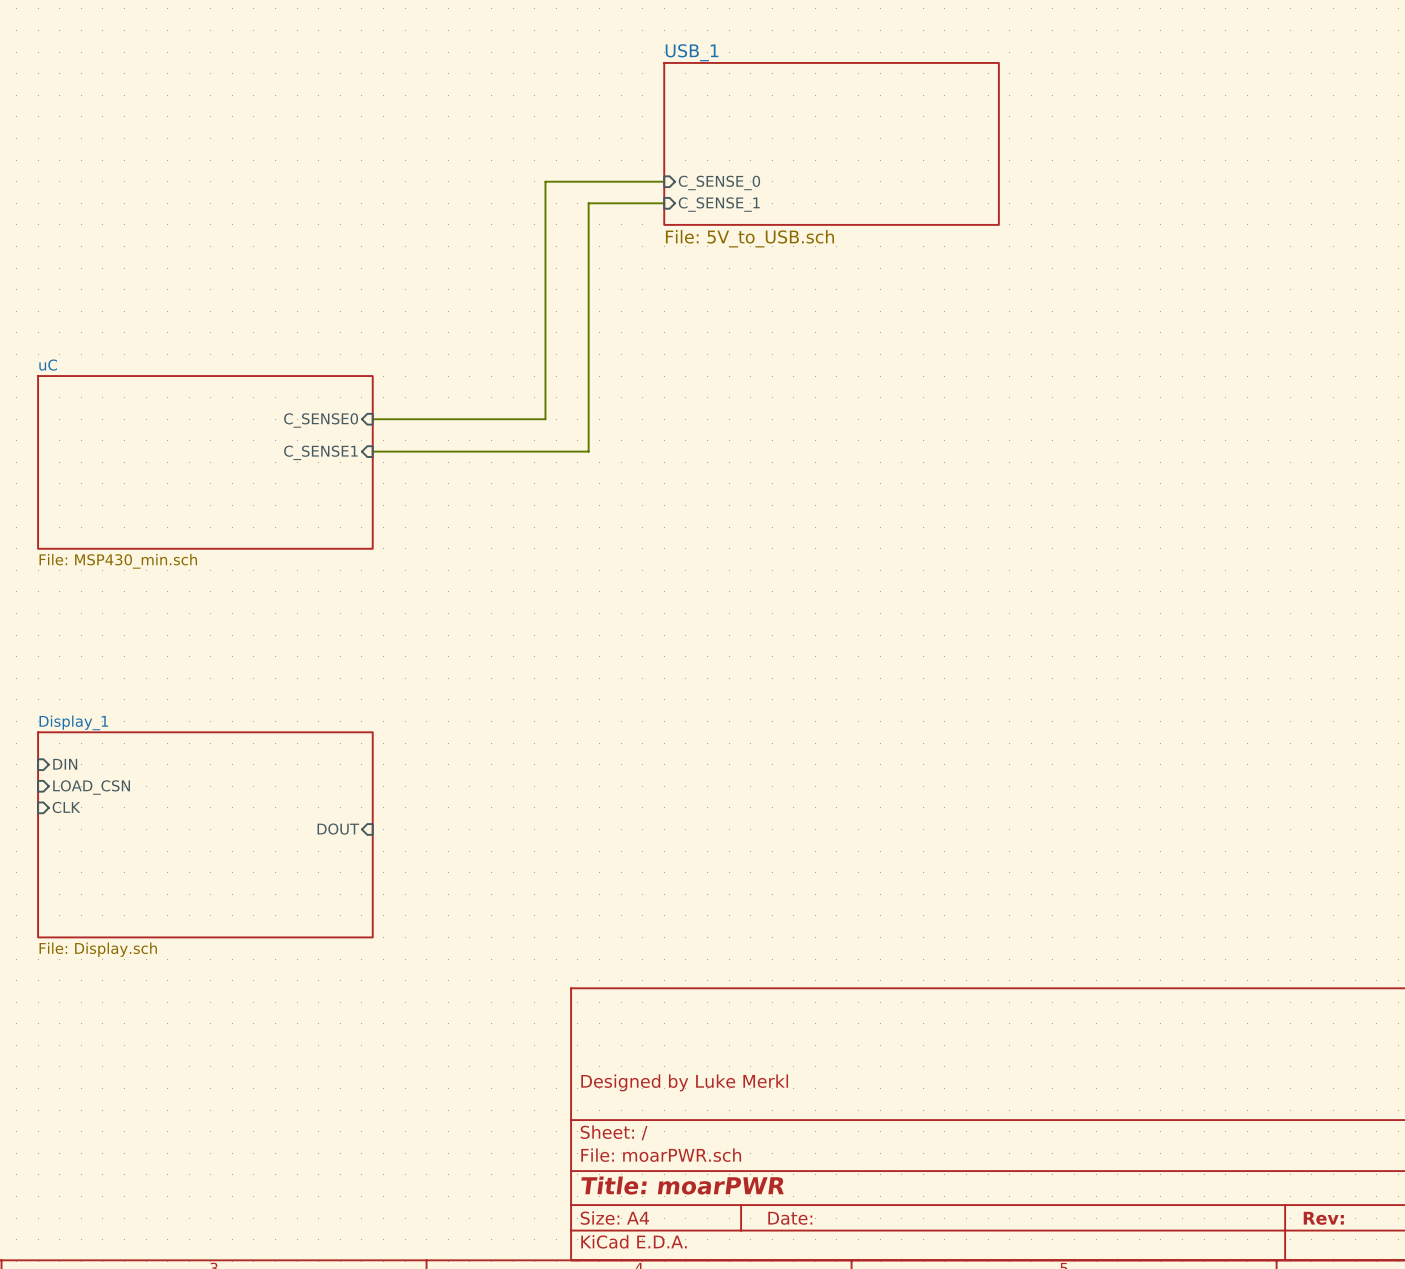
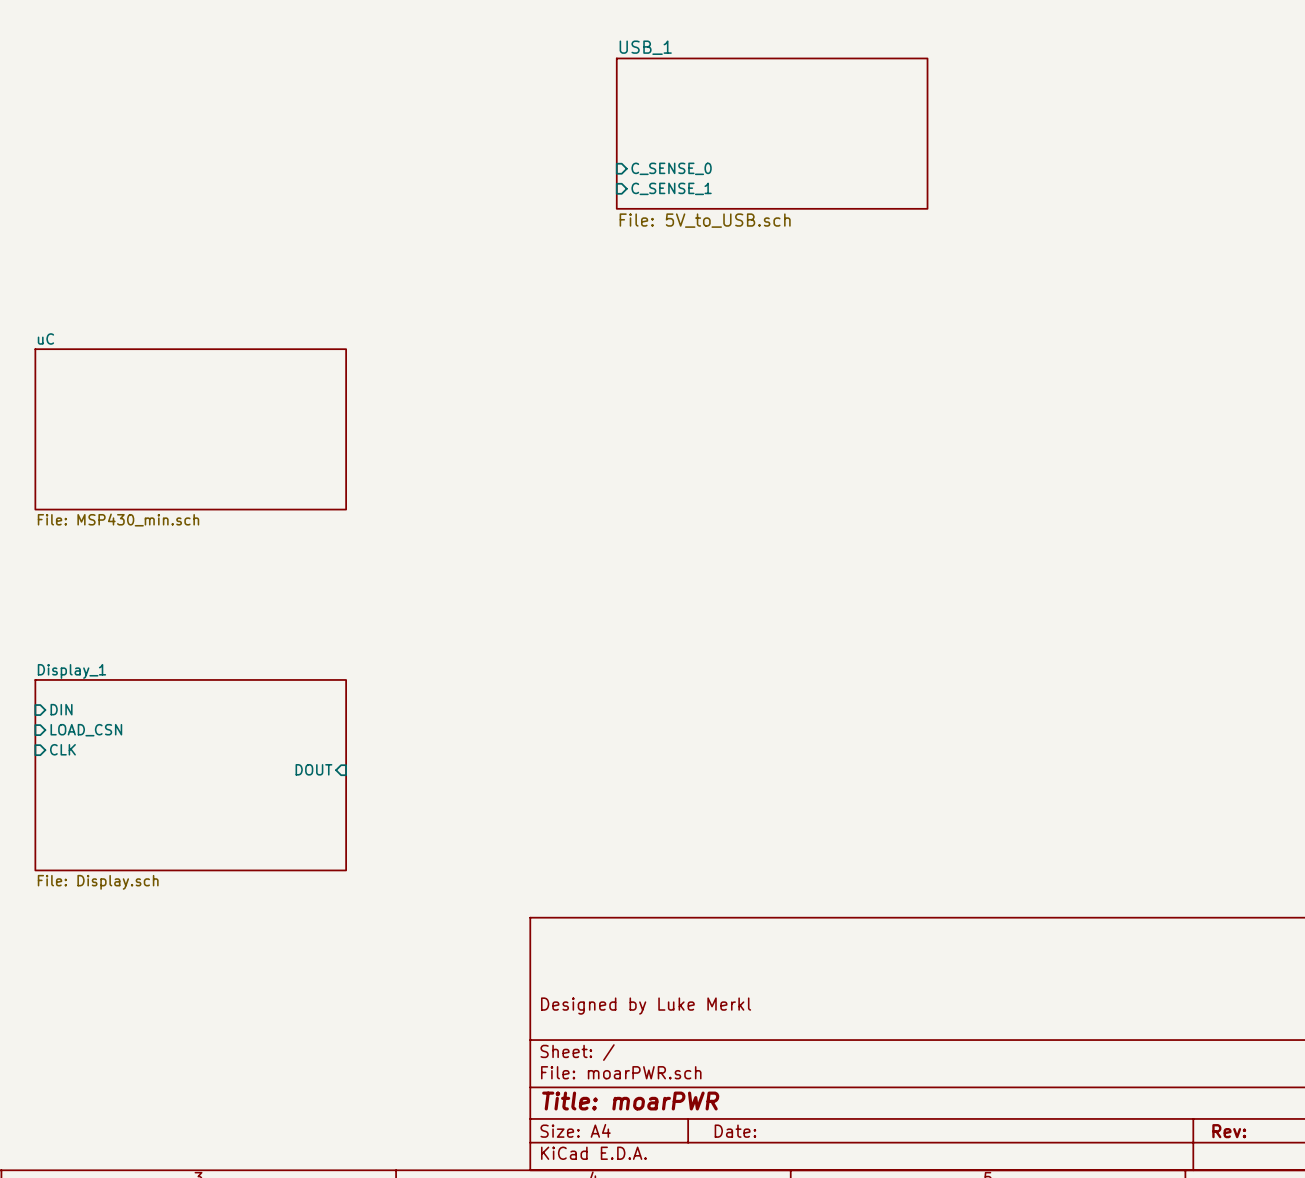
wire: (664, 181) (545, 181) (545, 419) (372, 419) -> none
wire: (664, 203) (588, 203) (588, 451) (372, 451) -> none
sheet pin: C_SENSE0 (321, 420) -> none
sheet pin: C_SENSE1 (320, 452) -> none

